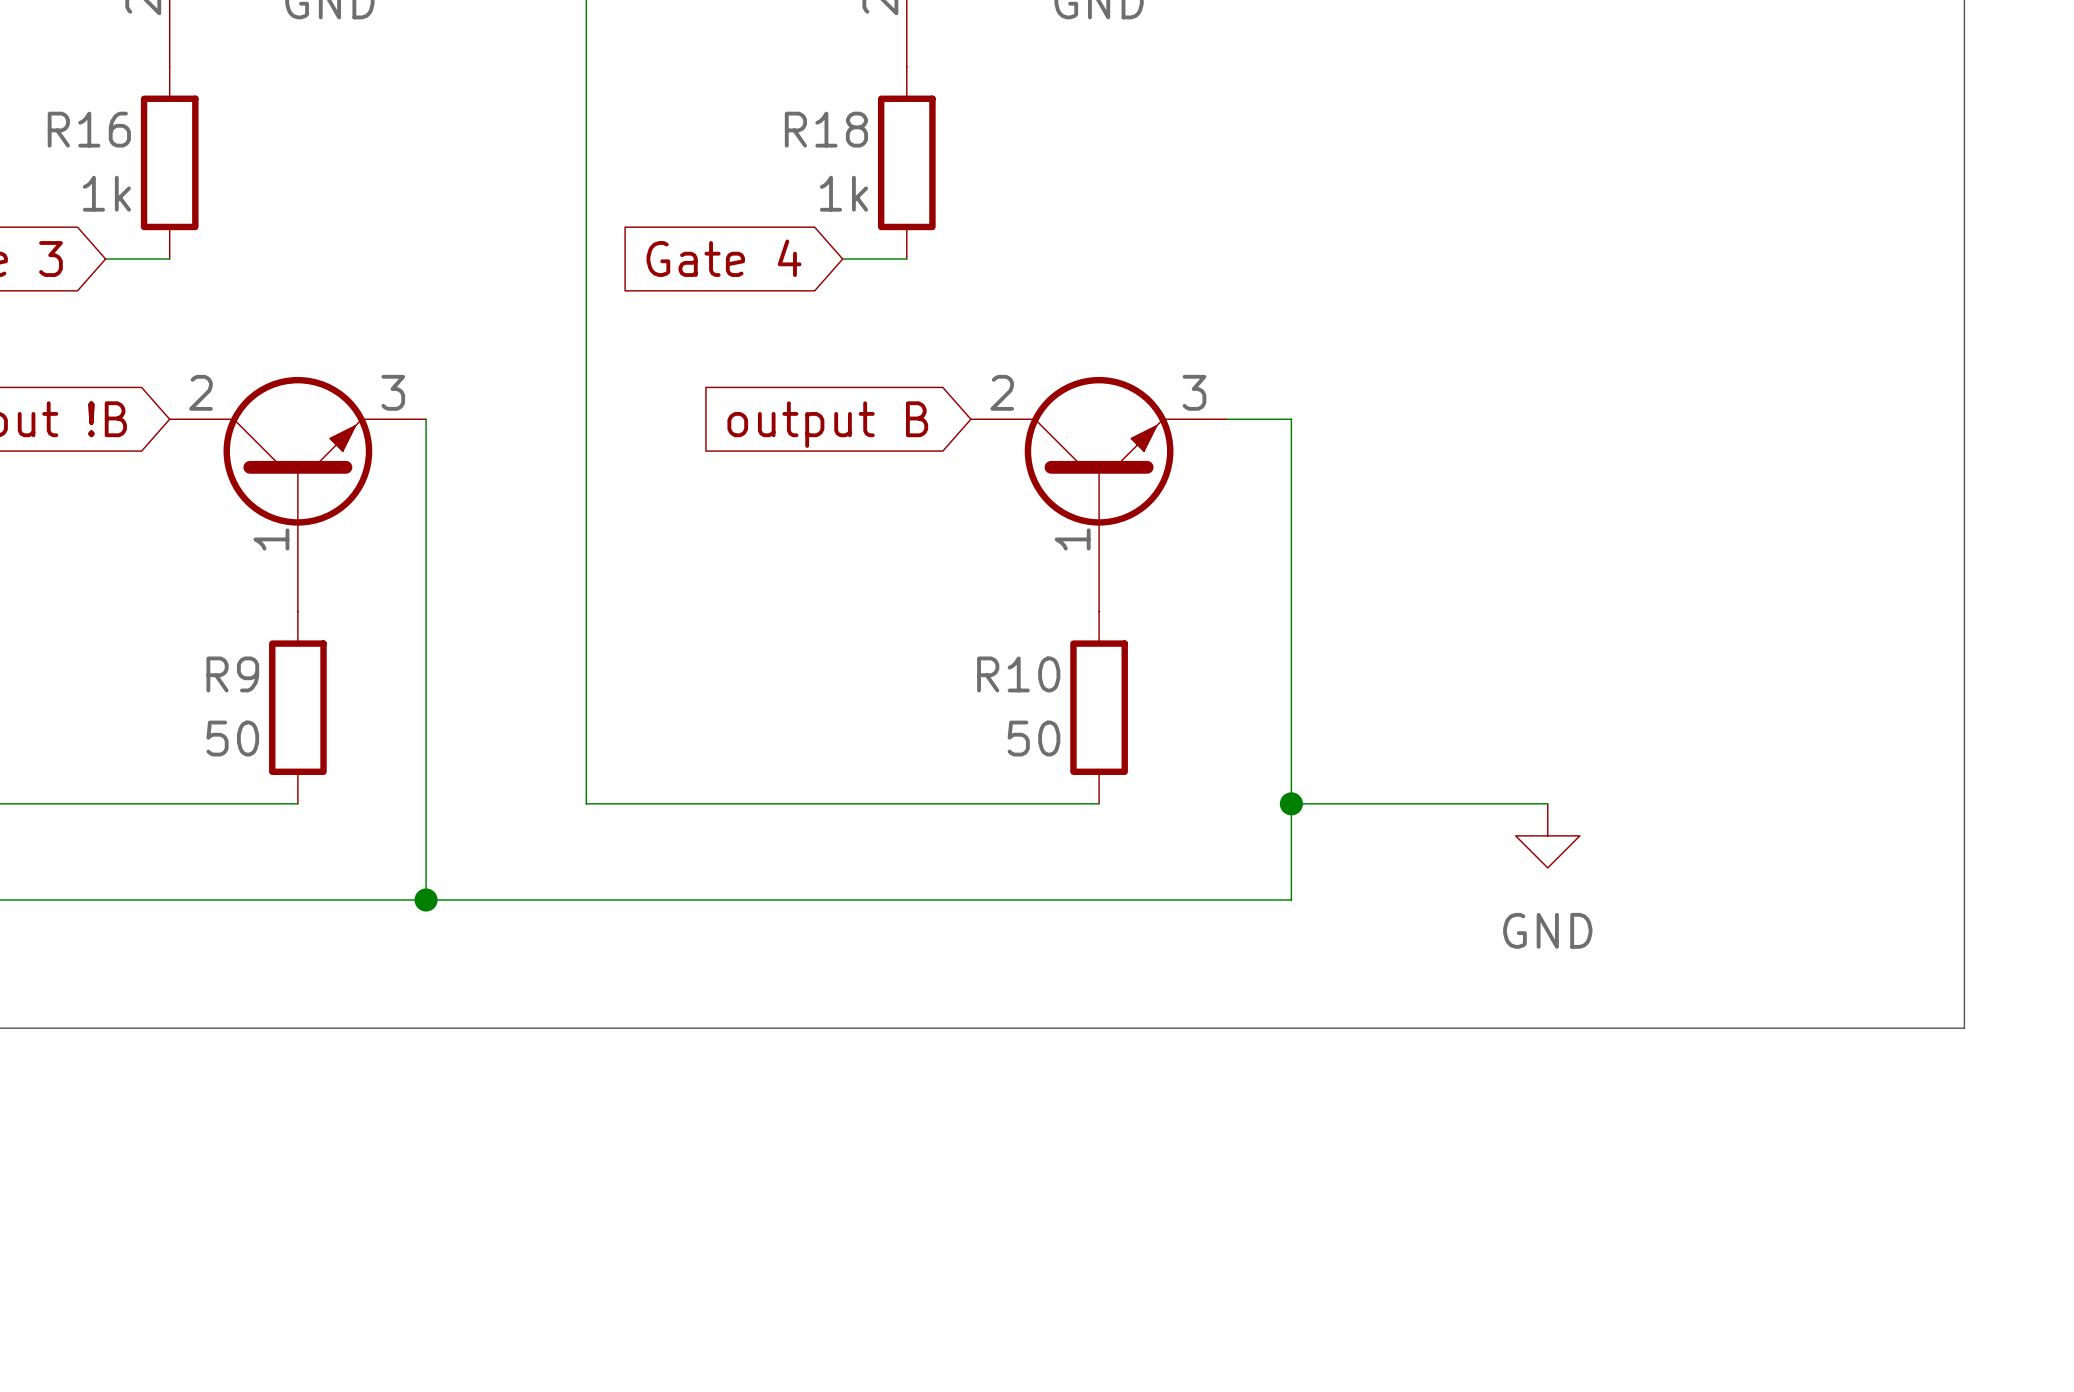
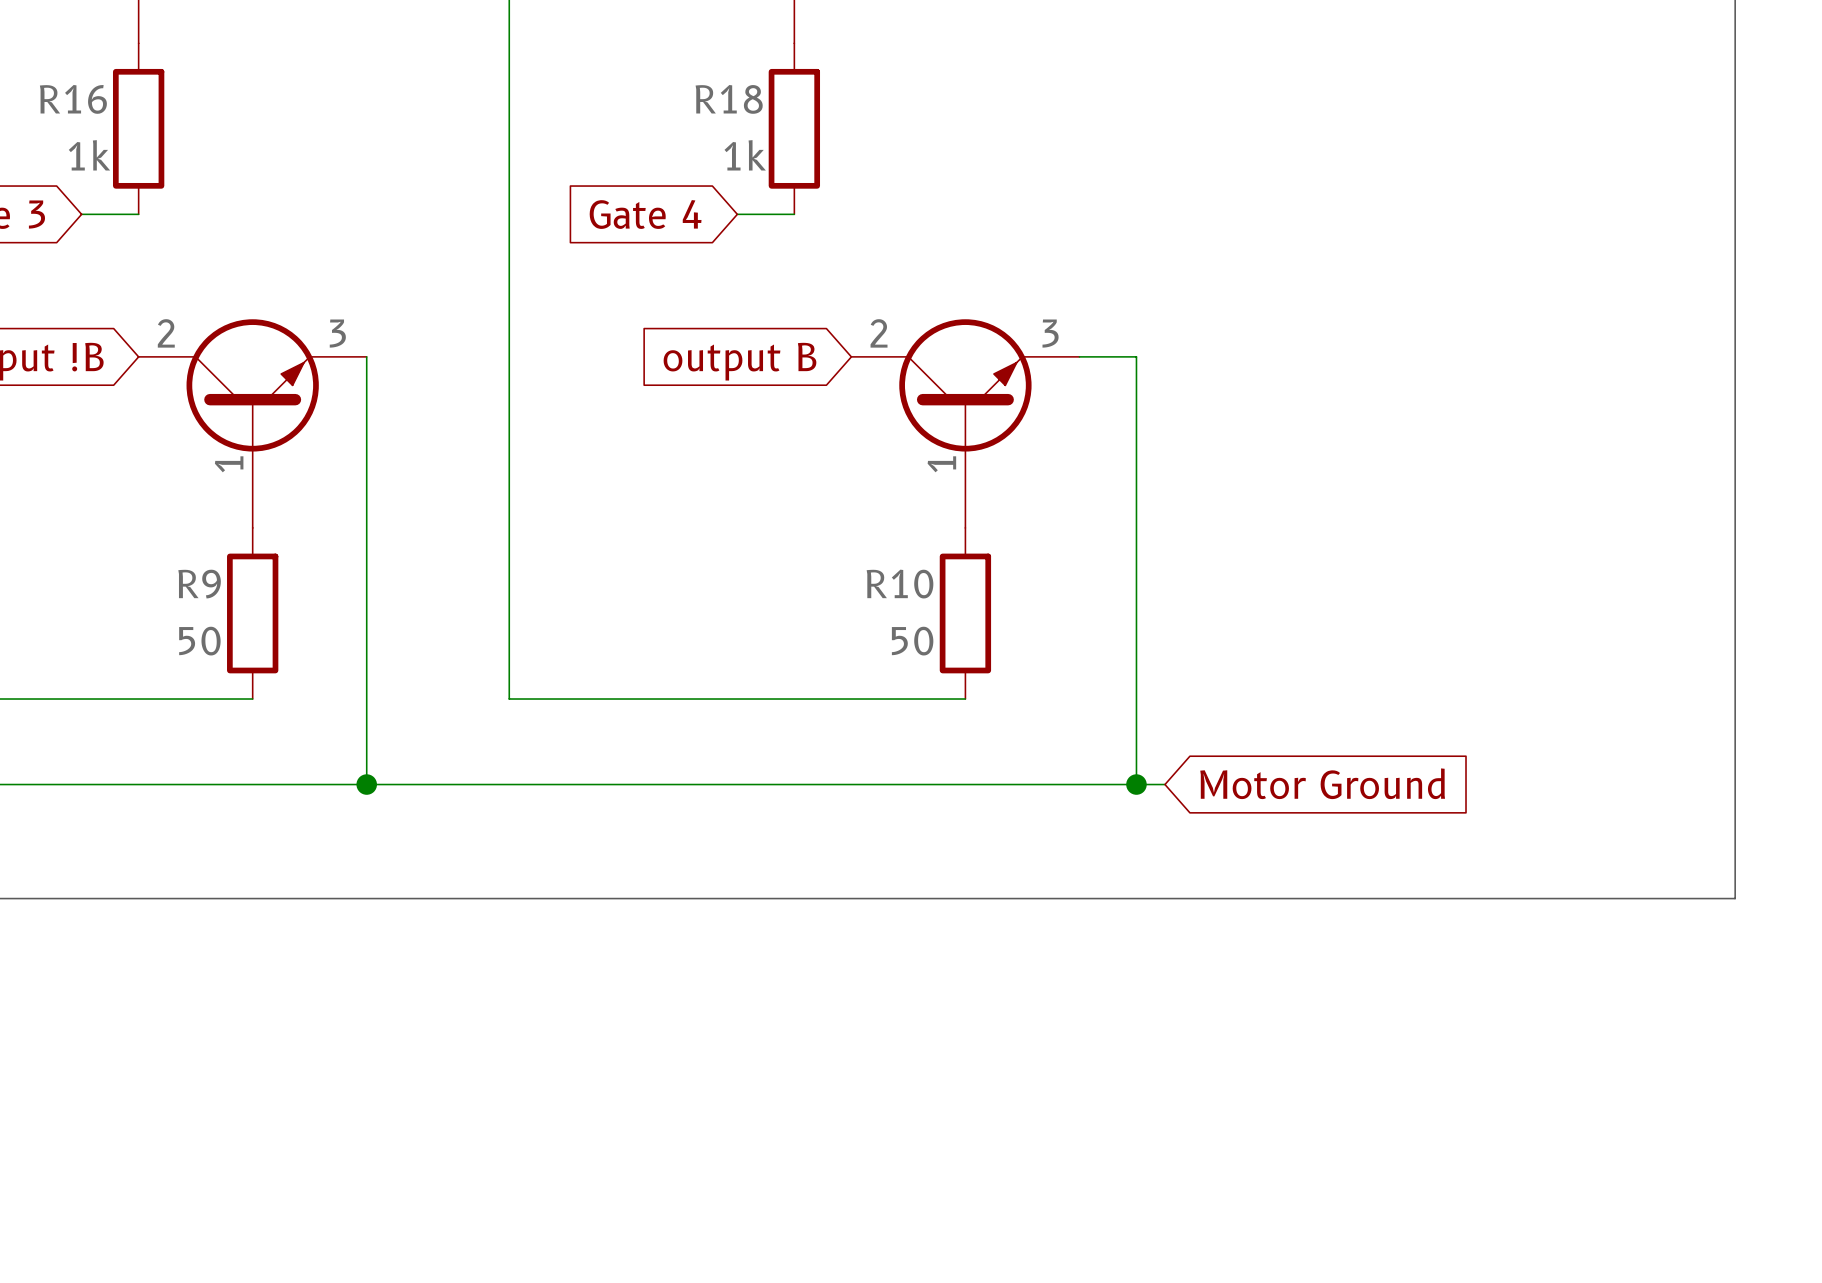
wire: (1291, 803) (1547, 803) -> none
junction position: (1291, 803) -> (1136, 784)
power symbol: GND (1547, 835) -> none
wire: none -> (1136, 784) (1164, 784)
global label: none -> Motor Ground (1322, 783)

